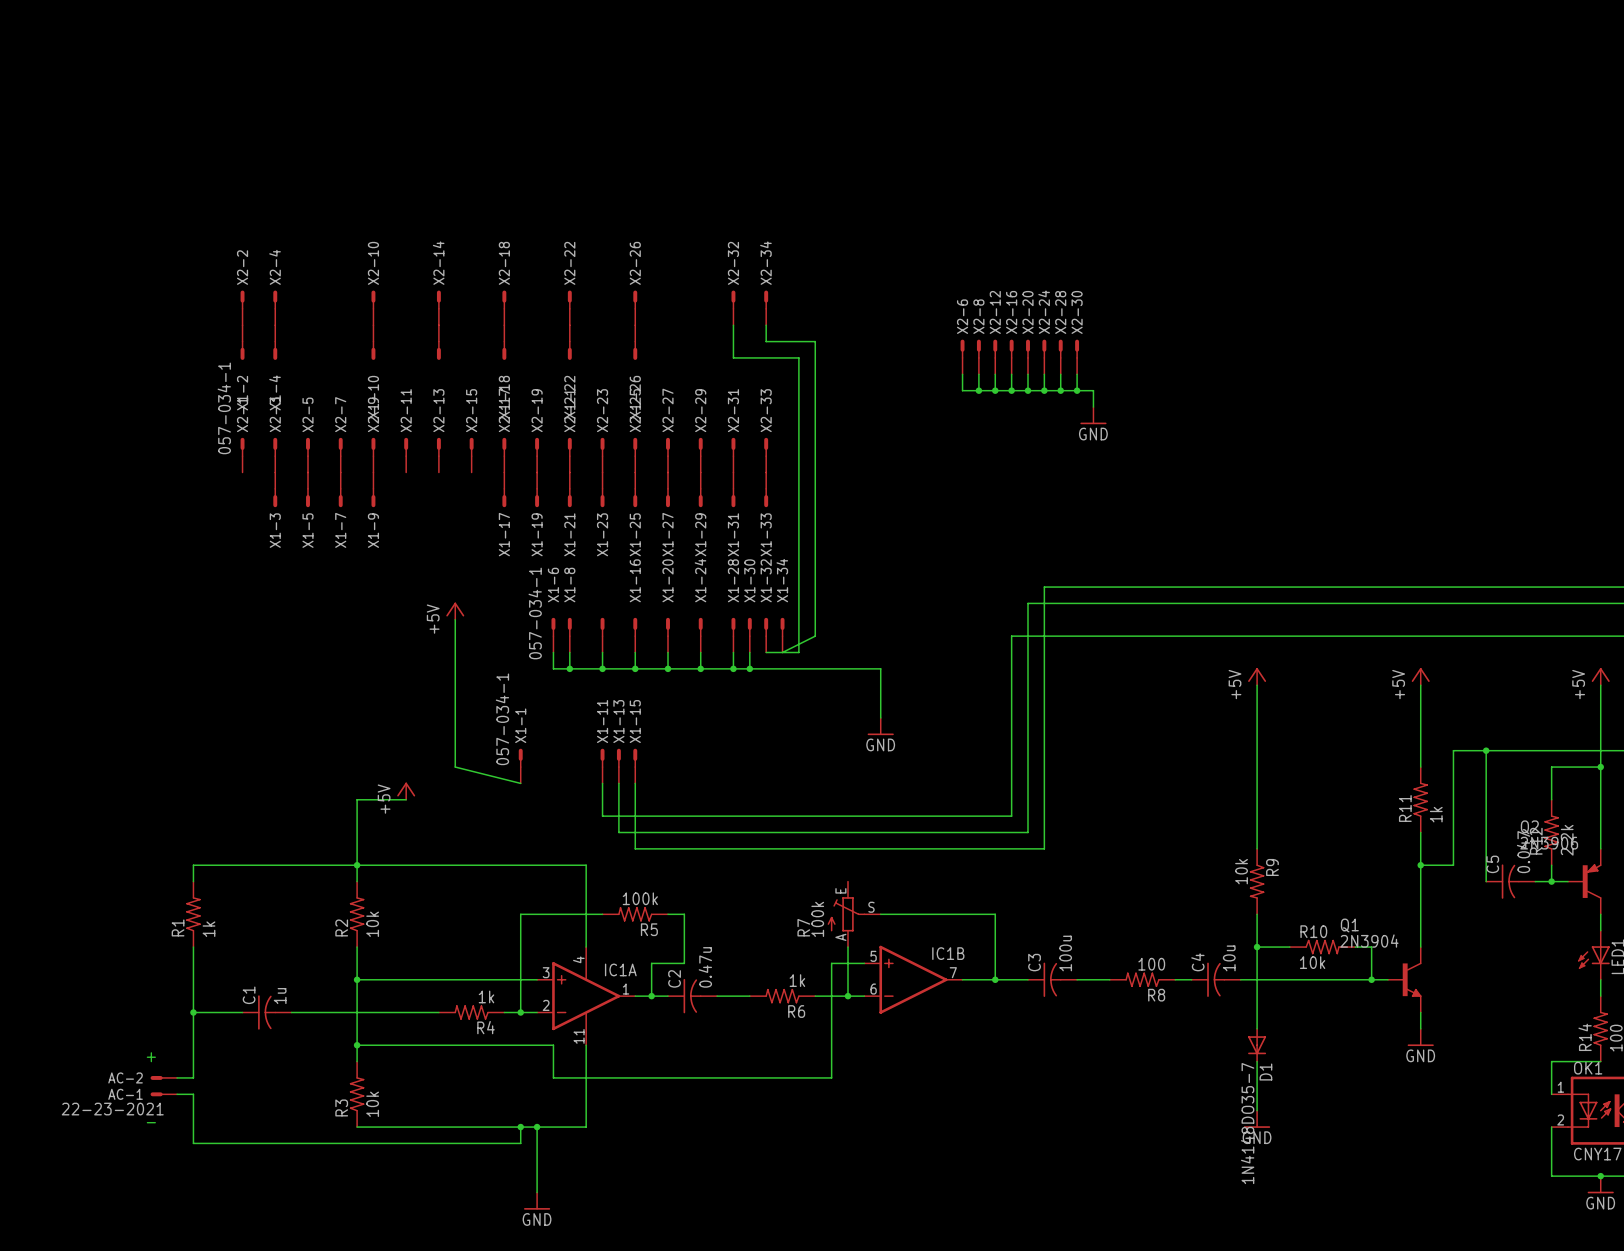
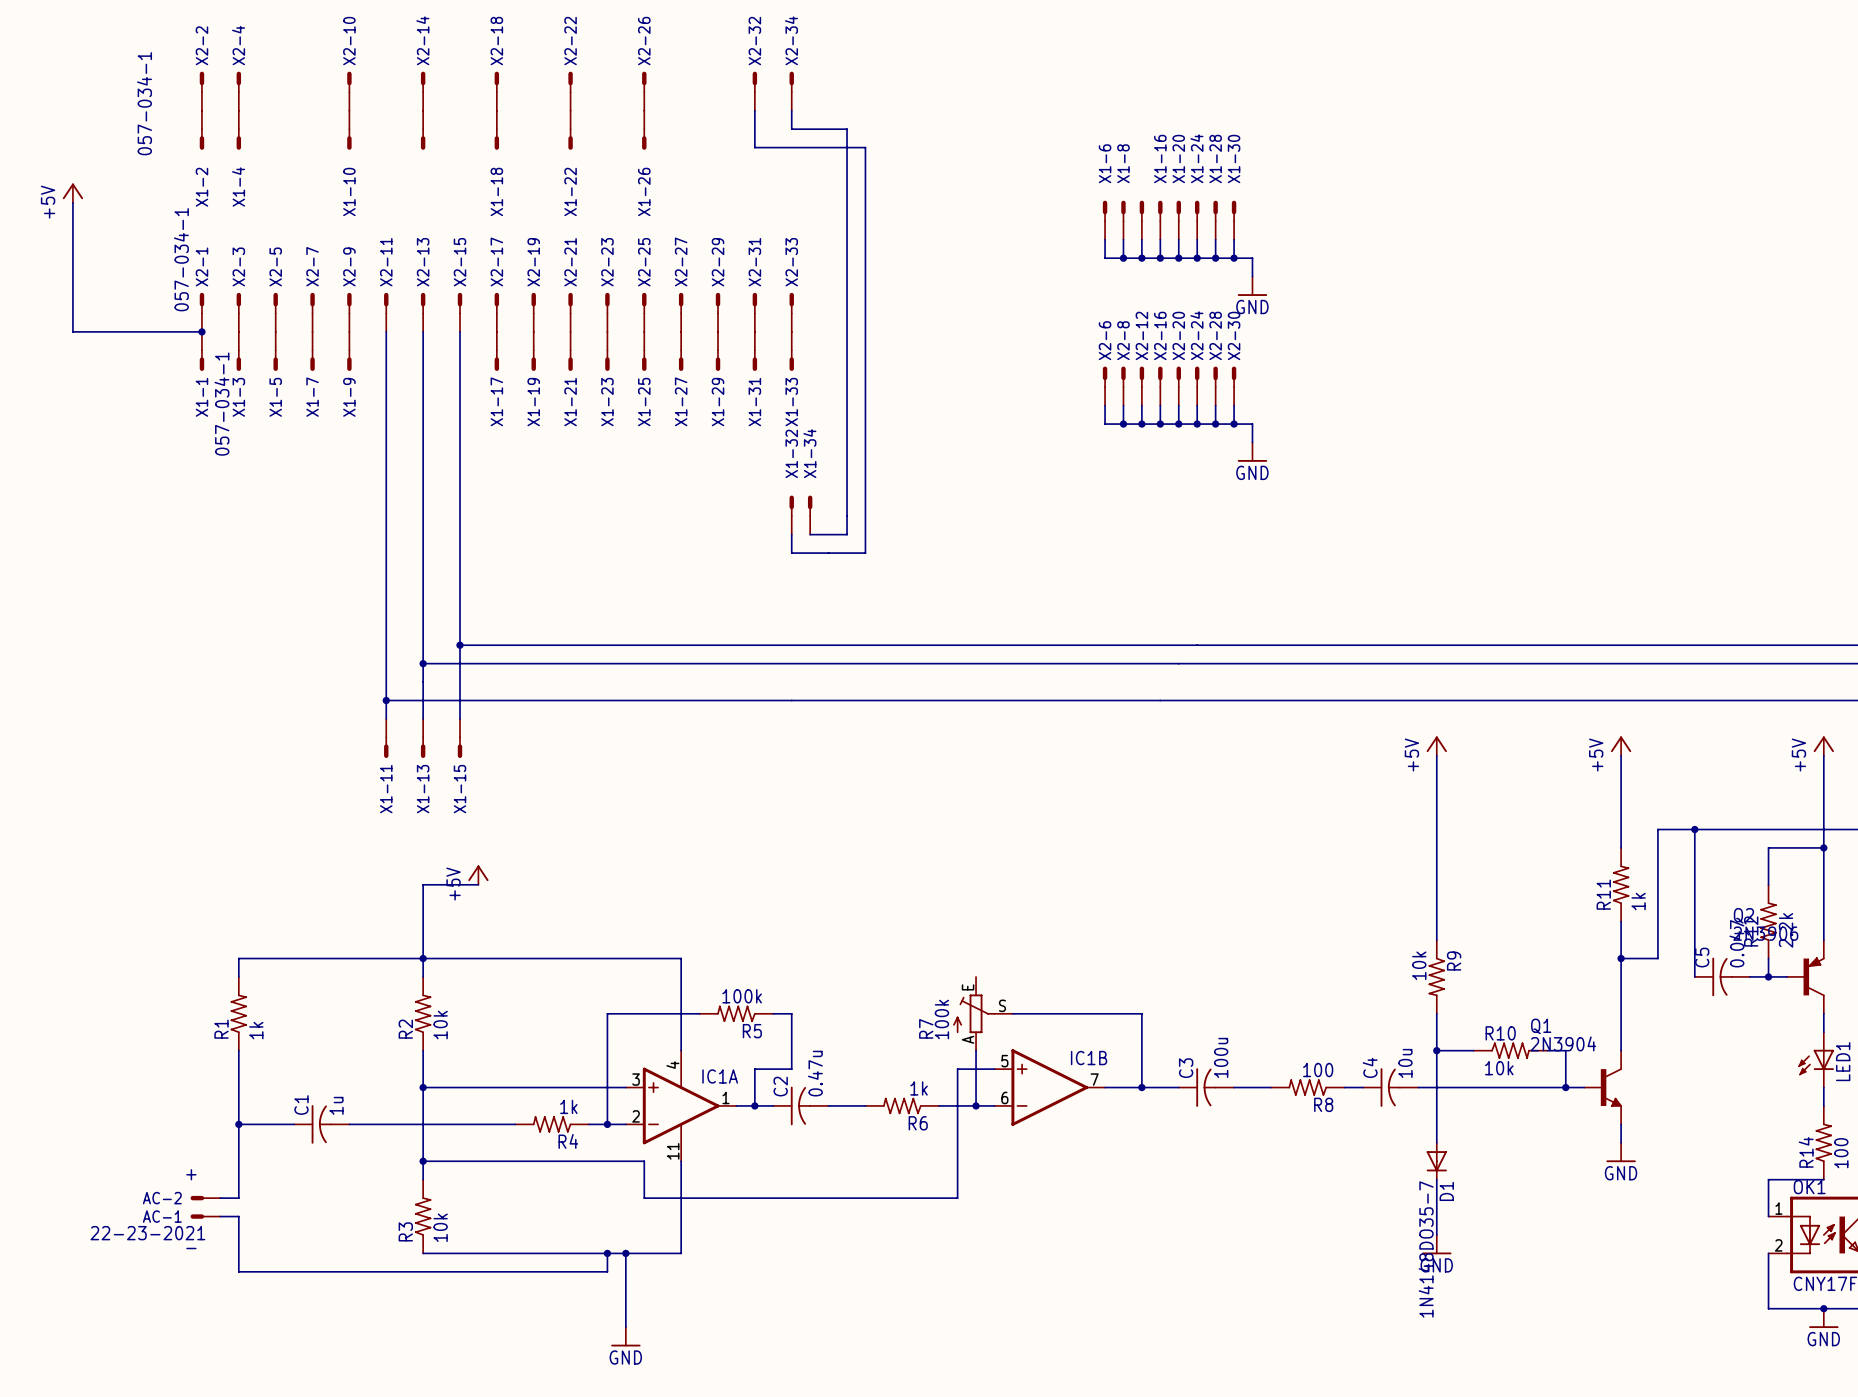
wire: none -> (754, 110) (754, 147) (865, 147) (865, 553) (791, 553) (791, 534)
wire: none -> (791, 110) (791, 129) (847, 129) (847, 350)
part: none -> (423, 130)
power symbol: none -> +5V (72, 193)
wire: none -> (72, 202) (72, 331) (201, 331)
part: none -> (1141, 220)
wire: none -> (1105, 239) (1105, 258) (1252, 258) (1252, 276)
wire: none -> (1123, 239) (1123, 258)
wire: none -> (1141, 239) (1141, 258)
wire: none -> (1160, 239) (1160, 258)
wire: none -> (1178, 239) (1178, 258)
wire: none -> (1197, 239) (1197, 258)
wire: none -> (1215, 239) (1215, 258)
wire: none -> (1234, 239) (1234, 258)
junction: none -> (1123, 258)
junction: none -> (1141, 258)
junction: none -> (1160, 258)
junction: none -> (1178, 258)
junction: none -> (1197, 258)
junction: none -> (1215, 258)
junction: none -> (1234, 258)
power symbol: none -> GND (1252, 286)
X2-2 position: (242, 307) -> (201, 91)
X2-4 position: (275, 307) -> (238, 91)
X2-10 position: (373, 307) -> (349, 91)
X2-14 position: (438, 307) -> (423, 91)
X2-18 position: (504, 307) -> (496, 91)
X2-22 position: (569, 307) -> (570, 91)
X2-26 position: (635, 307) -> (644, 91)
X2-32 position: (733, 307) -> (754, 91)
X2-34 position: (766, 307) -> (791, 91)
junction: none -> (201, 331)
wire: none -> (386, 331) (386, 718)
wire: none -> (423, 331) (423, 718)
wire: none -> (459, 331) (459, 718)
wire: (766, 325) (766, 341) (815, 341) (815, 636) (782, 652) -> none
X1-2 position: (242, 342) -> (201, 130)
X1-4 position: (275, 342) -> (238, 130)
X1-10 position: (373, 342) -> (349, 130)
part: (438, 342) -> none
X1-18 position: (504, 342) -> (496, 130)
X1-22 position: (569, 342) -> (570, 130)
X1-26 position: (635, 342) -> (644, 130)
wire: (733, 357) (798, 357) (798, 652) (766, 652) -> (847, 387) (847, 534) (810, 534)
X2-1 position: (242, 455) -> (201, 312)
X2-3 position: (275, 455) -> (238, 312)
X2-5 position: (307, 455) -> (275, 312)
X2-7 position: (340, 455) -> (312, 312)
X2-9 position: (373, 455) -> (349, 312)
X2-11 position: (406, 455) -> (386, 312)
X2-13 position: (438, 455) -> (423, 312)
X2-15 position: (471, 455) -> (459, 312)
X2-17 position: (504, 455) -> (496, 312)
X2-19 position: (537, 455) -> (533, 312)
X2-21 position: (569, 455) -> (570, 312)
X2-23 position: (602, 455) -> (607, 312)
X2-25 position: (635, 455) -> (644, 312)
X2-27 position: (667, 455) -> (681, 312)
X2-29 position: (700, 455) -> (718, 312)
X2-31 position: (733, 455) -> (754, 312)
X2-33 position: (766, 455) -> (791, 312)
X1-3 position: (275, 489) -> (238, 351)
X1-5 position: (307, 489) -> (275, 351)
X1-7 position: (340, 489) -> (312, 351)
X1-9 position: (373, 489) -> (349, 351)
X1-17 position: (504, 489) -> (496, 351)
X1-19 position: (537, 489) -> (533, 351)
X1-21 position: (569, 489) -> (570, 351)
X1-23 position: (602, 489) -> (607, 351)
X1-25 position: (635, 489) -> (644, 351)
X1-27 position: (667, 489) -> (681, 351)
X1-29 position: (700, 489) -> (718, 351)
X1-31 position: (733, 489) -> (754, 351)
X1-33 position: (766, 489) -> (791, 351)
junction: none -> (459, 645)
wire: (1044, 587) (1044, 848) (635, 848) (635, 783) -> (1197, 645) (459, 645)
junction: none -> (423, 663)
wire: (1028, 603) (1028, 832) (618, 832) (618, 783) -> (1178, 663) (423, 663)
power symbol: +5V (455, 611) -> none
X1-2 value position: 057-034-1 (535, 613) -> 057-034-1 (144, 103)
wire: (455, 619) (455, 767) (520, 783) -> none
X1-6 position: (553, 635) -> (1105, 220)
X1-8 position: (569, 635) -> (1123, 220)
part: (602, 635) -> none
X1-16 position: (635, 635) -> (1160, 220)
X1-20 position: (667, 635) -> (1178, 220)
X1-24 position: (700, 635) -> (1197, 220)
X1-28 position: (733, 635) -> (1215, 220)
X1-30 position: (749, 635) -> (1234, 220)
X1-32 position: (766, 635) -> (791, 515)
X1-34 position: (782, 635) -> (810, 515)
junction: none -> (386, 700)
wire: (1011, 636) (1011, 816) (602, 816) (602, 783) -> (1160, 700) (386, 700)
wire: (553, 652) (553, 668) (880, 668) (880, 717) -> none
wire: (569, 652) (569, 668) -> none
wire: (602, 652) (602, 668) -> none
wire: (635, 652) (635, 668) -> none
wire: (667, 652) (667, 668) -> none
wire: (700, 652) (700, 668) -> none
wire: (733, 652) (733, 668) -> none
wire: (749, 652) (749, 668) -> none
junction: (569, 668) -> none
junction: (602, 668) -> none
junction: (635, 668) -> none
junction: (667, 668) -> none
junction: (700, 668) -> none
junction: (733, 668) -> none
junction: (749, 668) -> none
power symbol: GND (880, 726) -> none
X1-1 rotation: 0° (520, 758) -> 180° (201, 360)
X1-11 rotation: 0° (602, 758) -> 180° (386, 747)
X1-13 rotation: 0° (618, 758) -> 180° (423, 747)
X1-15 rotation: 0° (635, 758) -> 180° (459, 747)
X1-1 position: (520, 766) -> (201, 351)
X1-11 position: (602, 766) -> (386, 738)
X1-13 position: (618, 766) -> (423, 738)
X1-15 position: (635, 766) -> (459, 738)

